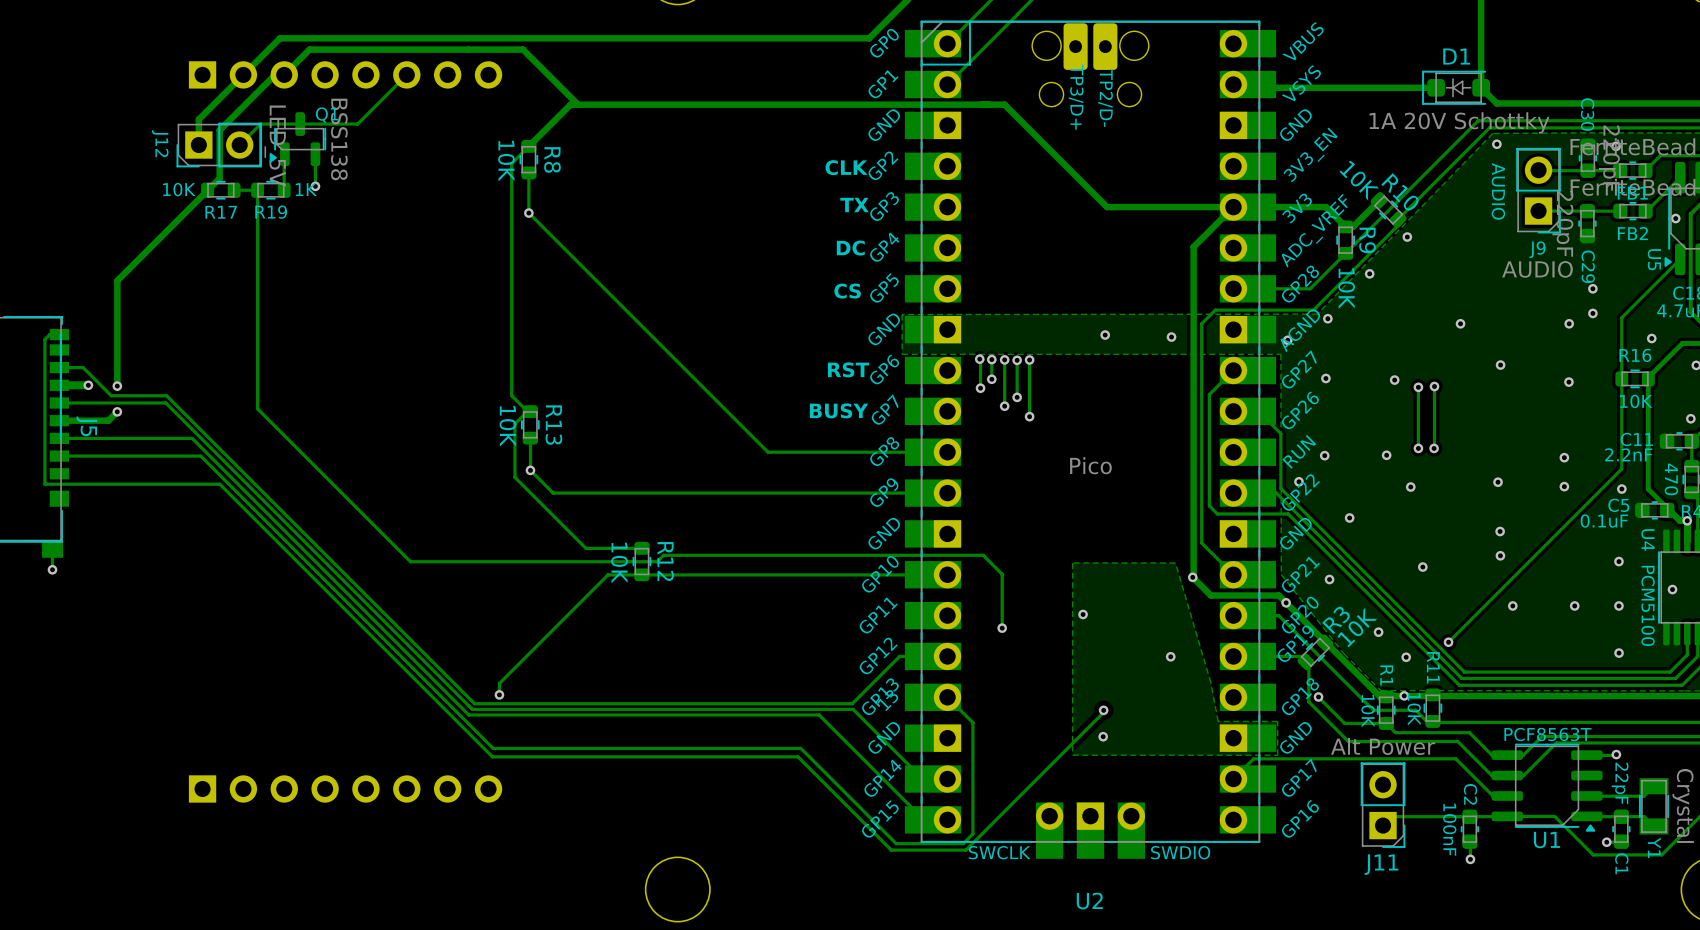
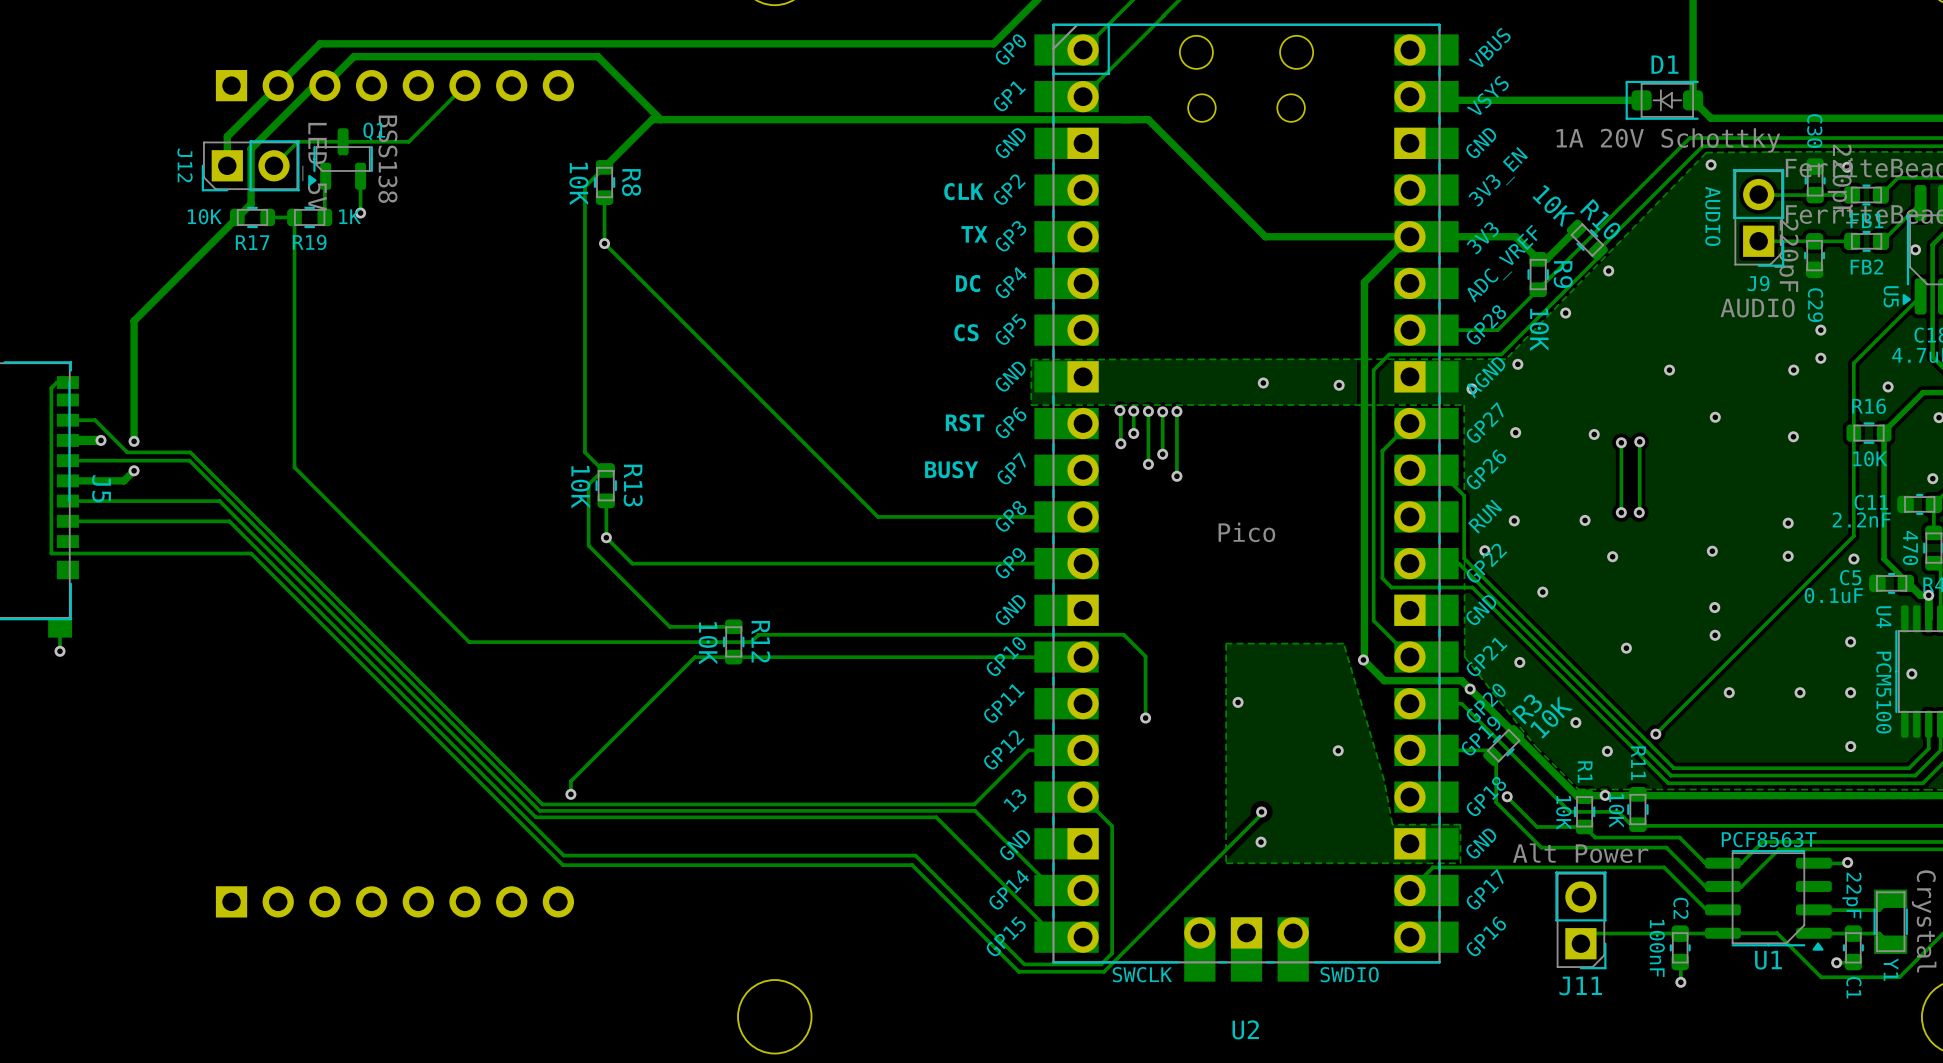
U2 footprint: [904, 20, 1277, 859] -> [1034, 23, 1459, 982]

